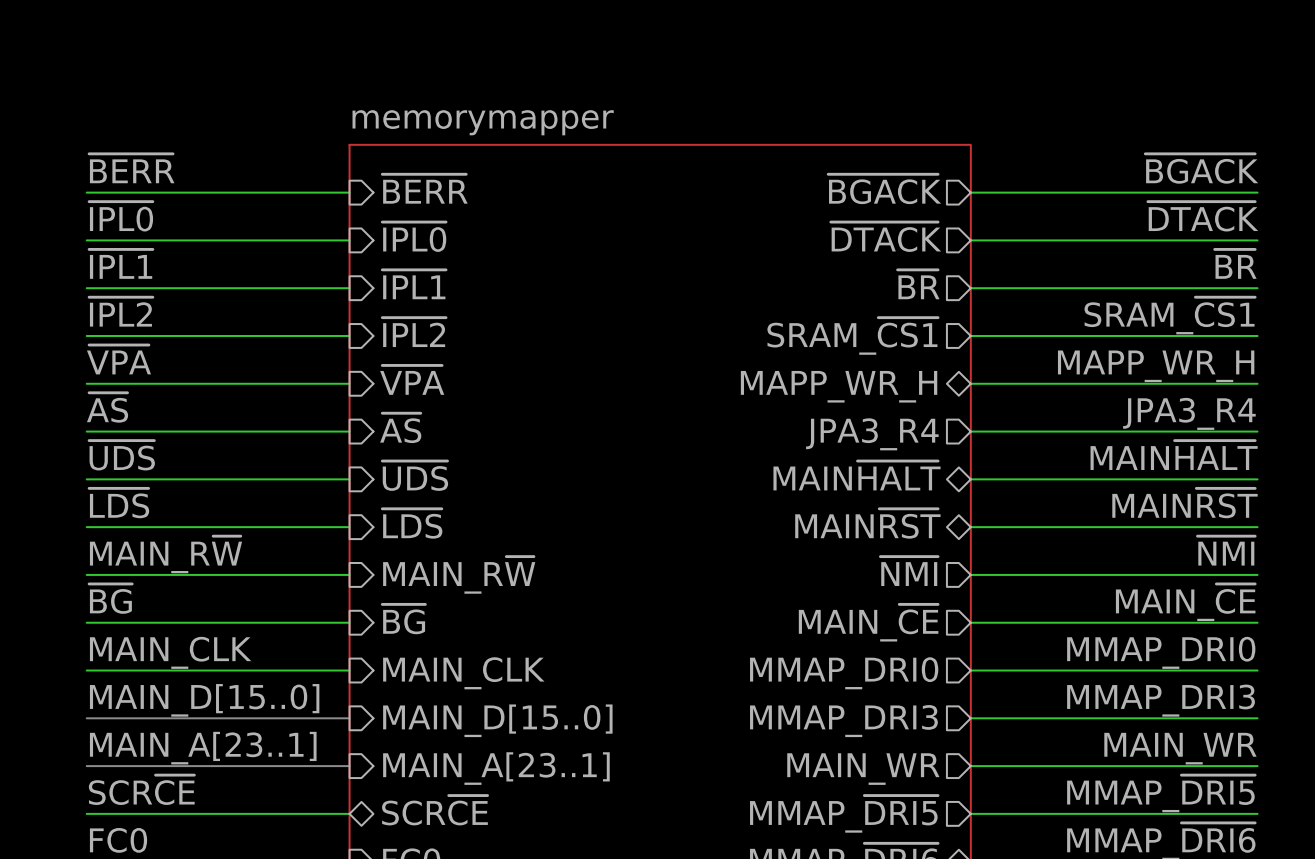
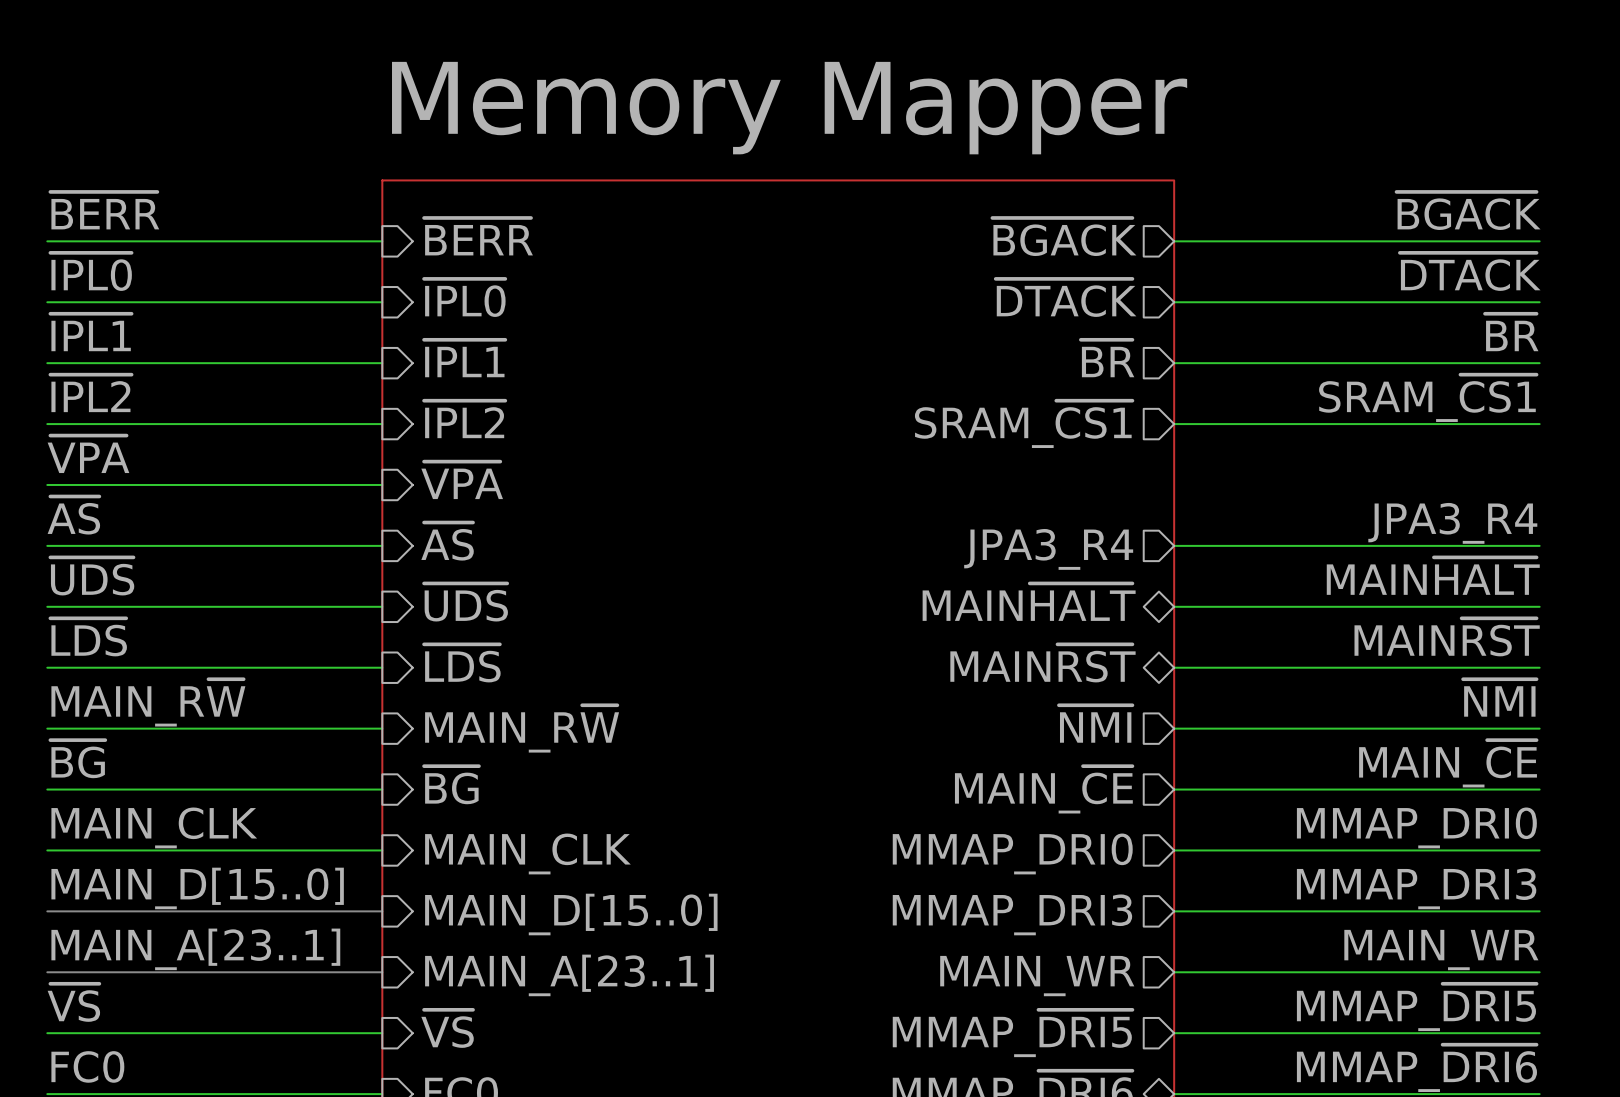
sheet memorymapper name: memorymapper (483, 122) -> Memory Mapper (789, 108)
label: MAPP_WR_H (1156, 366) -> none
wire: (970, 383) (1257, 383) -> none
sheet pin: MAPP_WR_H (839, 386) -> none
label: SCR~{CE} (141, 790) -> ~{VS} (73, 1002)
sheet pin shape: bidirectional (434, 810) -> input (447, 1028)
sheet pin: SCR~{CE} (434, 810) -> ~{VS} (447, 1028)

